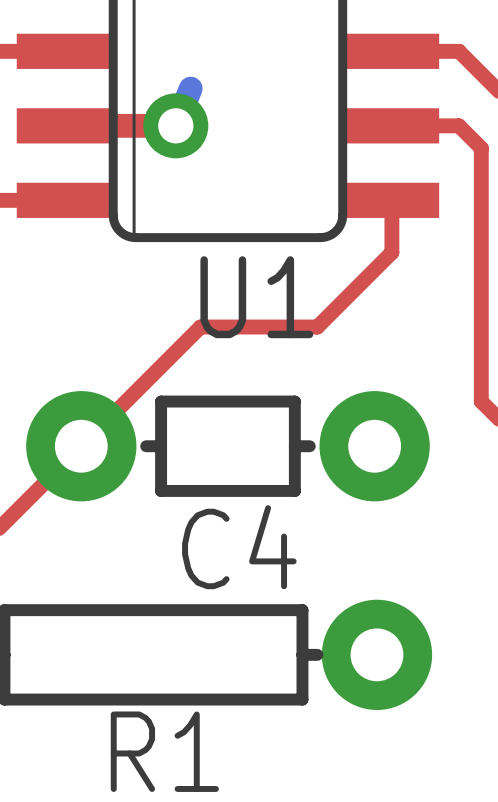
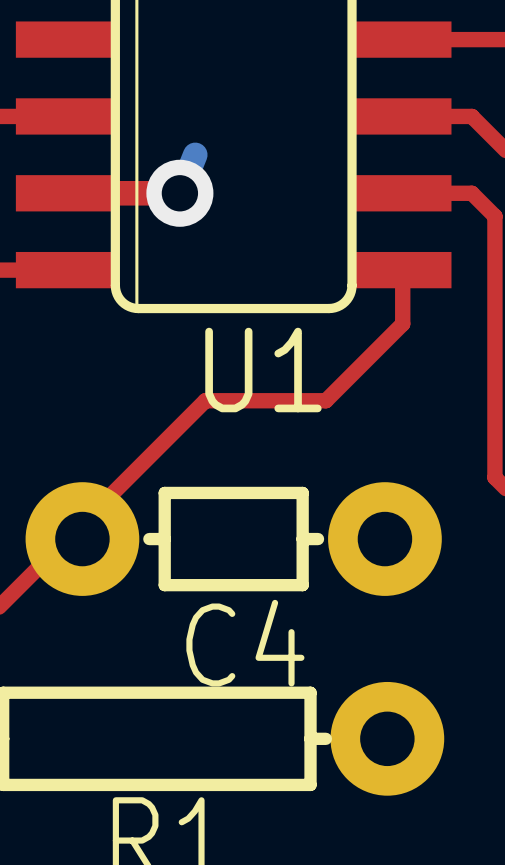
C4 position: (227, 446) -> (233, 539)

